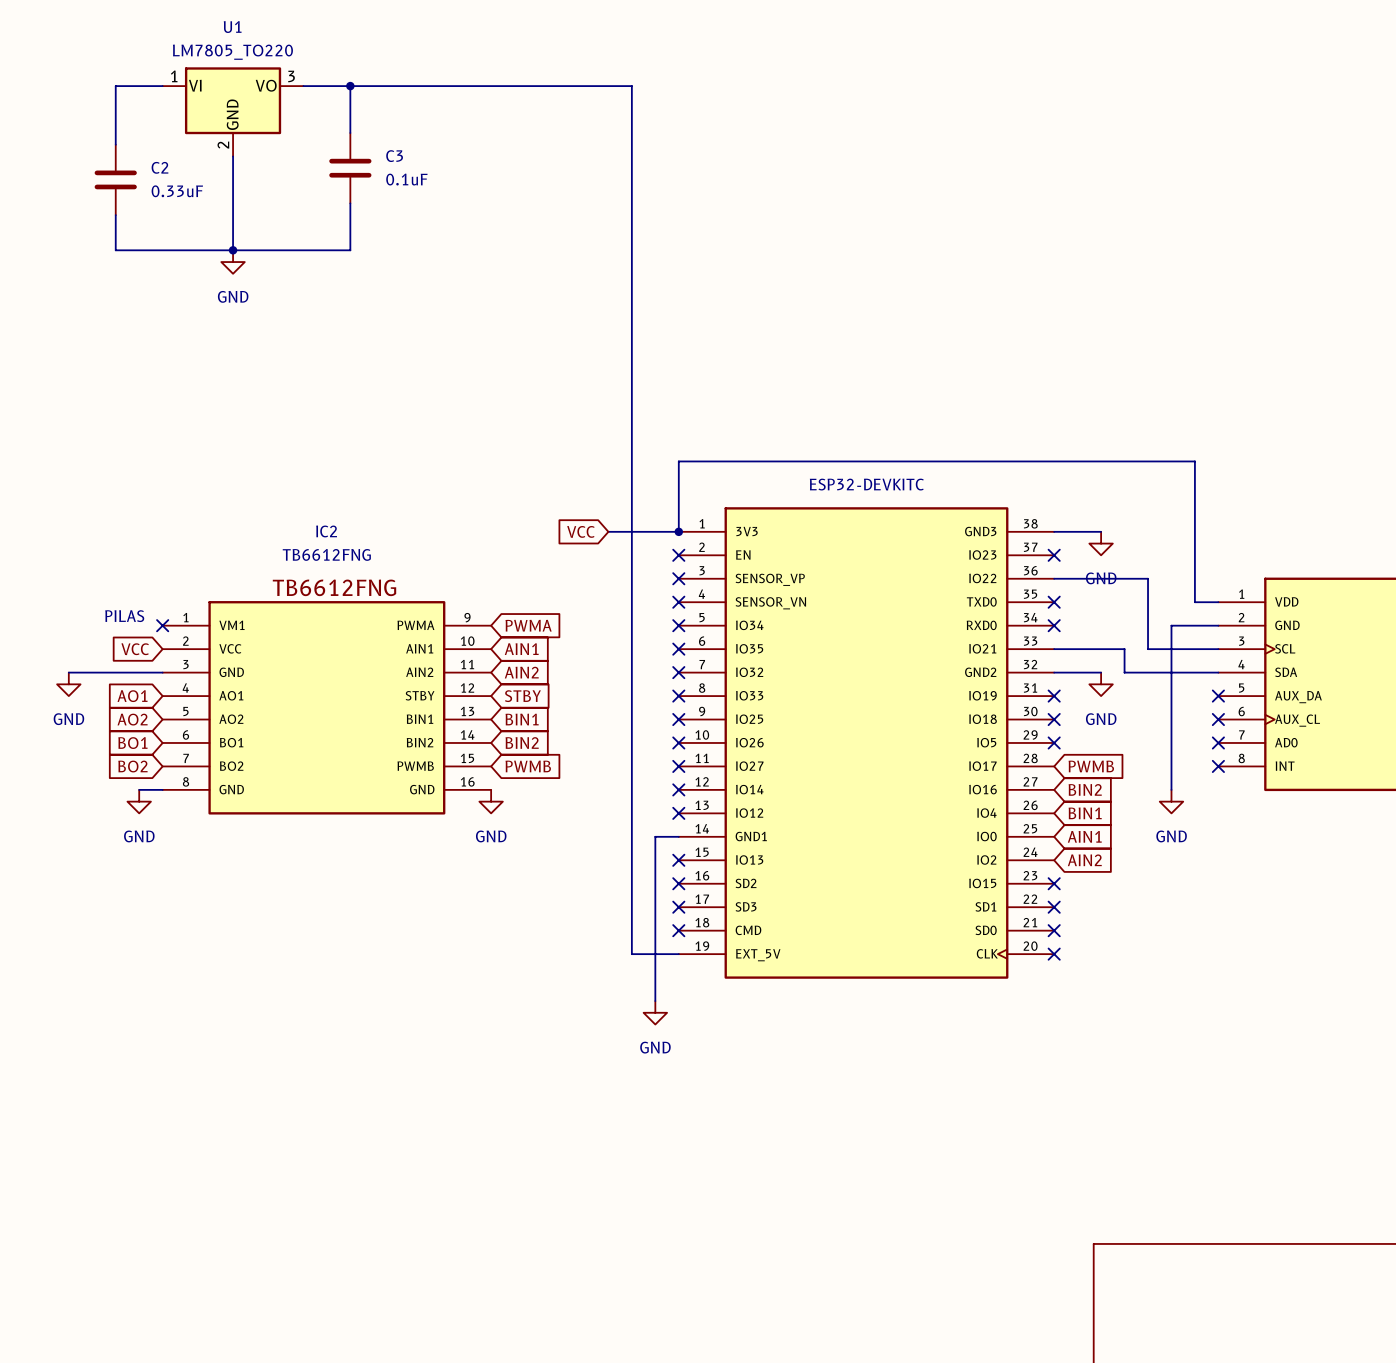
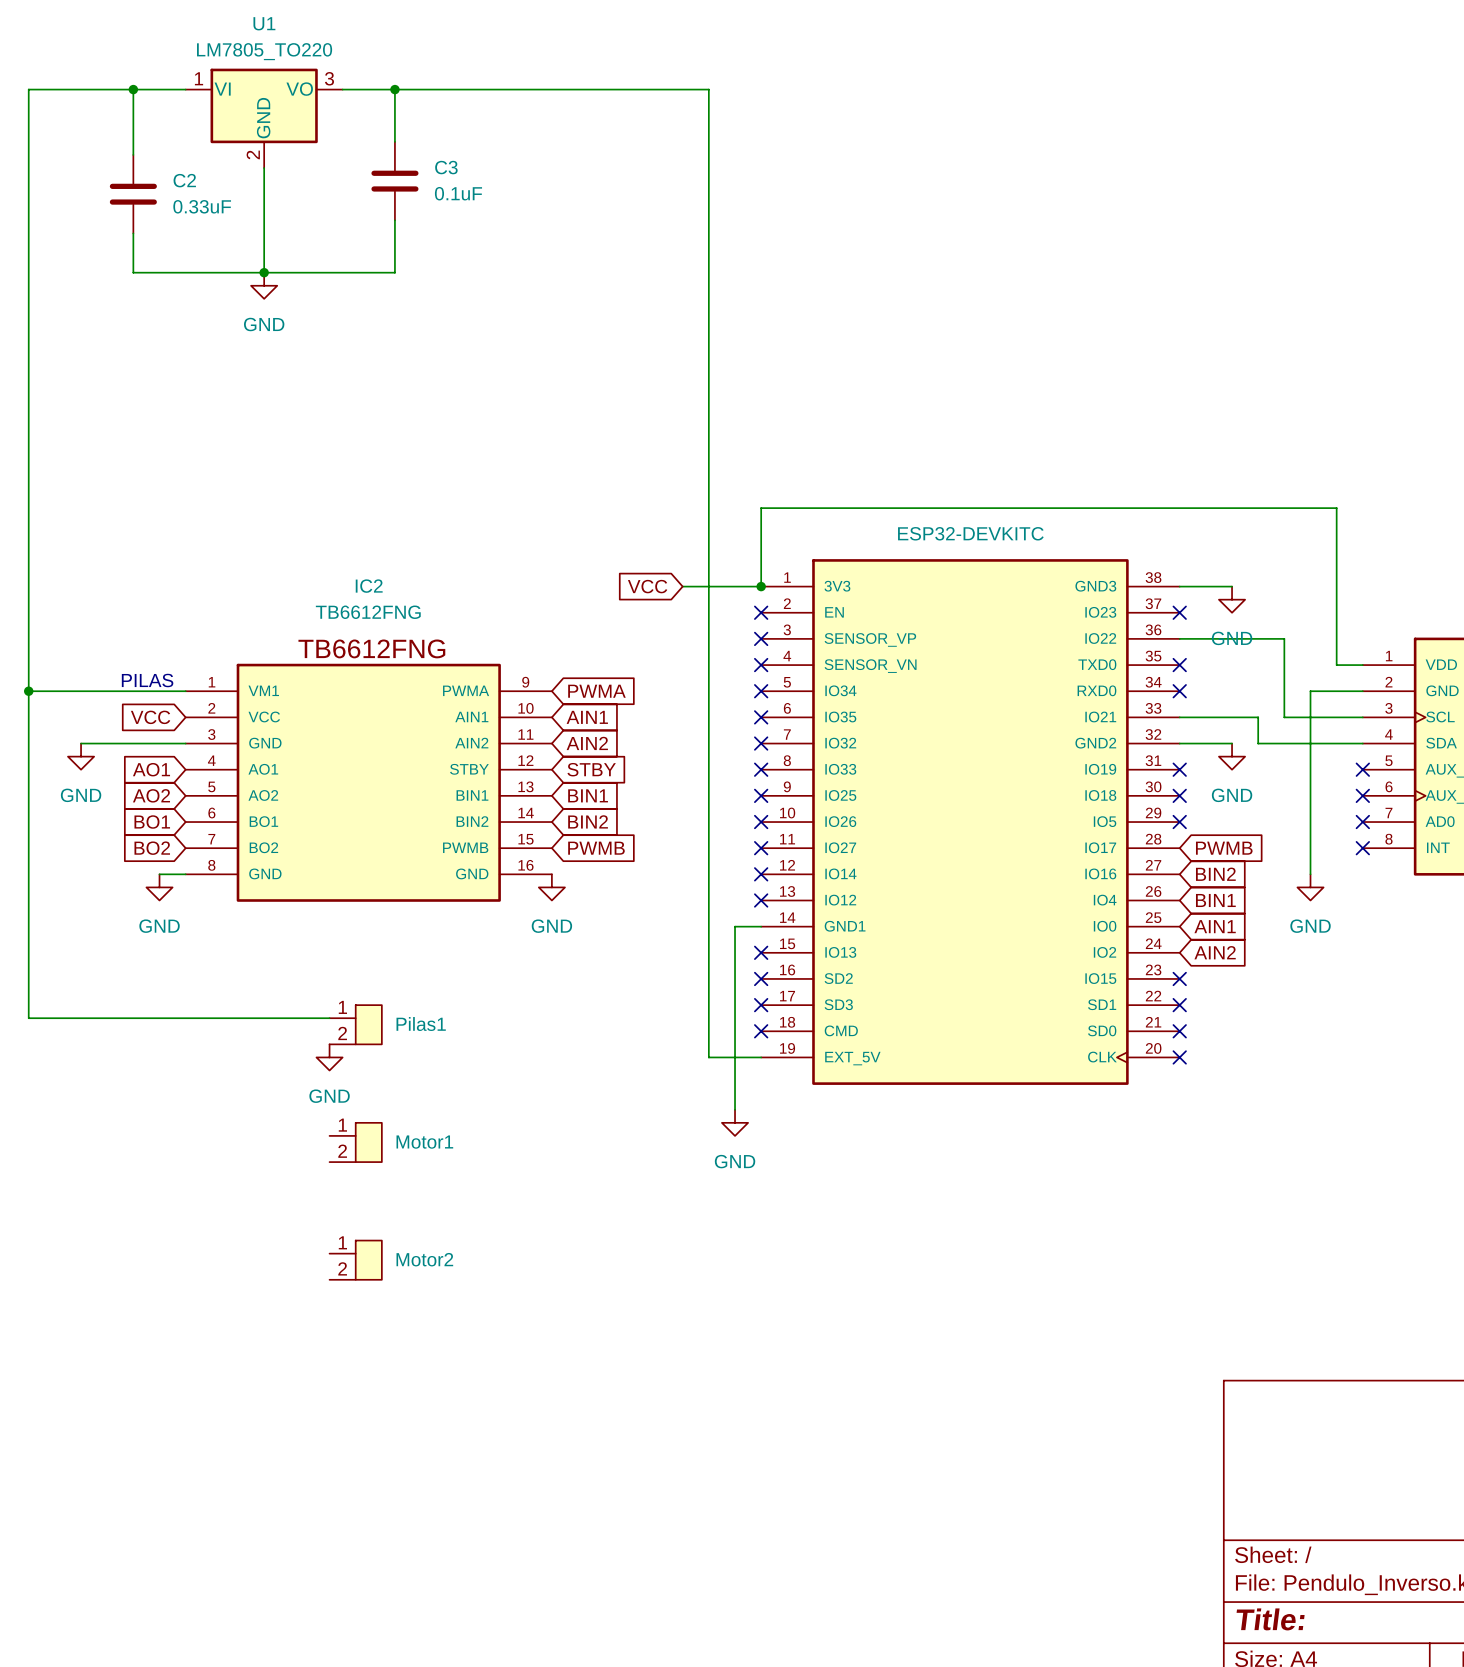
wire: none -> (133, 89) (28, 89) (28, 1018) (329, 1018)
junction: none -> (133, 89)
wire: none -> (28, 691) (185, 691)
junction: none -> (28, 691)
no-connect mark: (162, 625) -> none
Pilas1: none -> (355, 1024)
power symbol: none -> GND (329, 1057)
Motor1: none -> (355, 1142)
Motor2: none -> (355, 1260)

